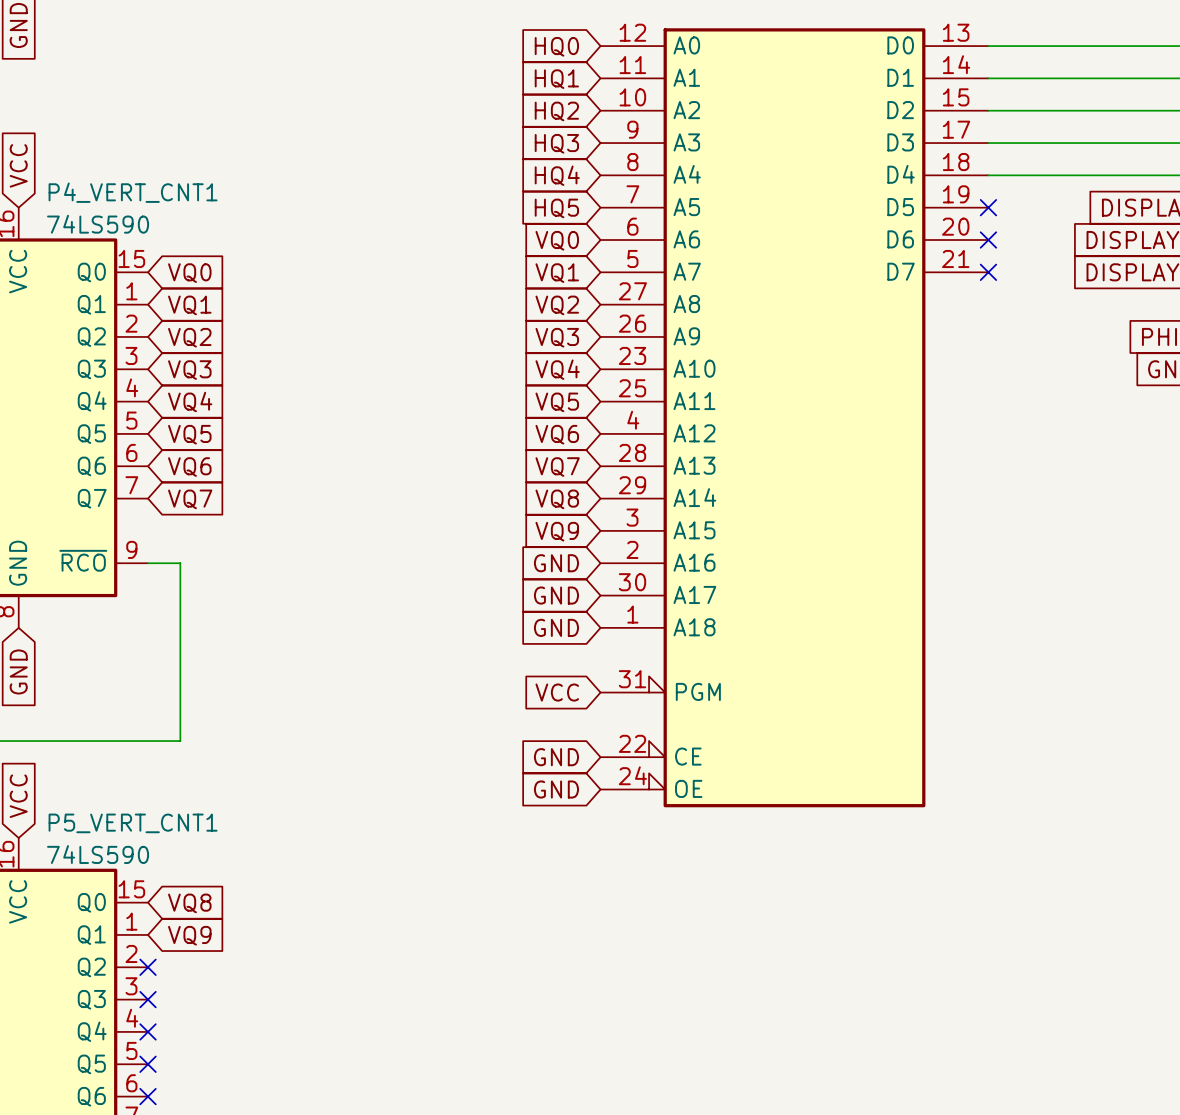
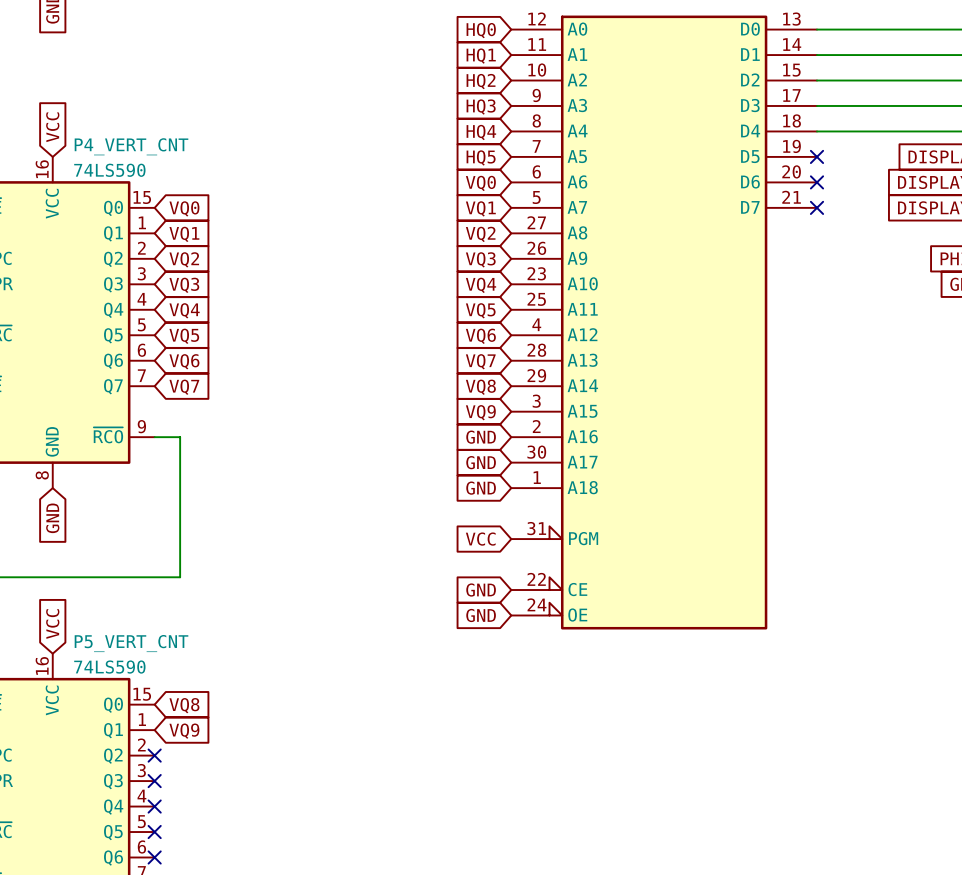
P4_VERT_CNT1 name: P4_VERT_CNT1 (133, 192) -> P4_VERT_CNT (131, 146)
P5_VERT_CNT1 name: P5_VERT_CNT1 (133, 823) -> P5_VERT_CNT (131, 643)

